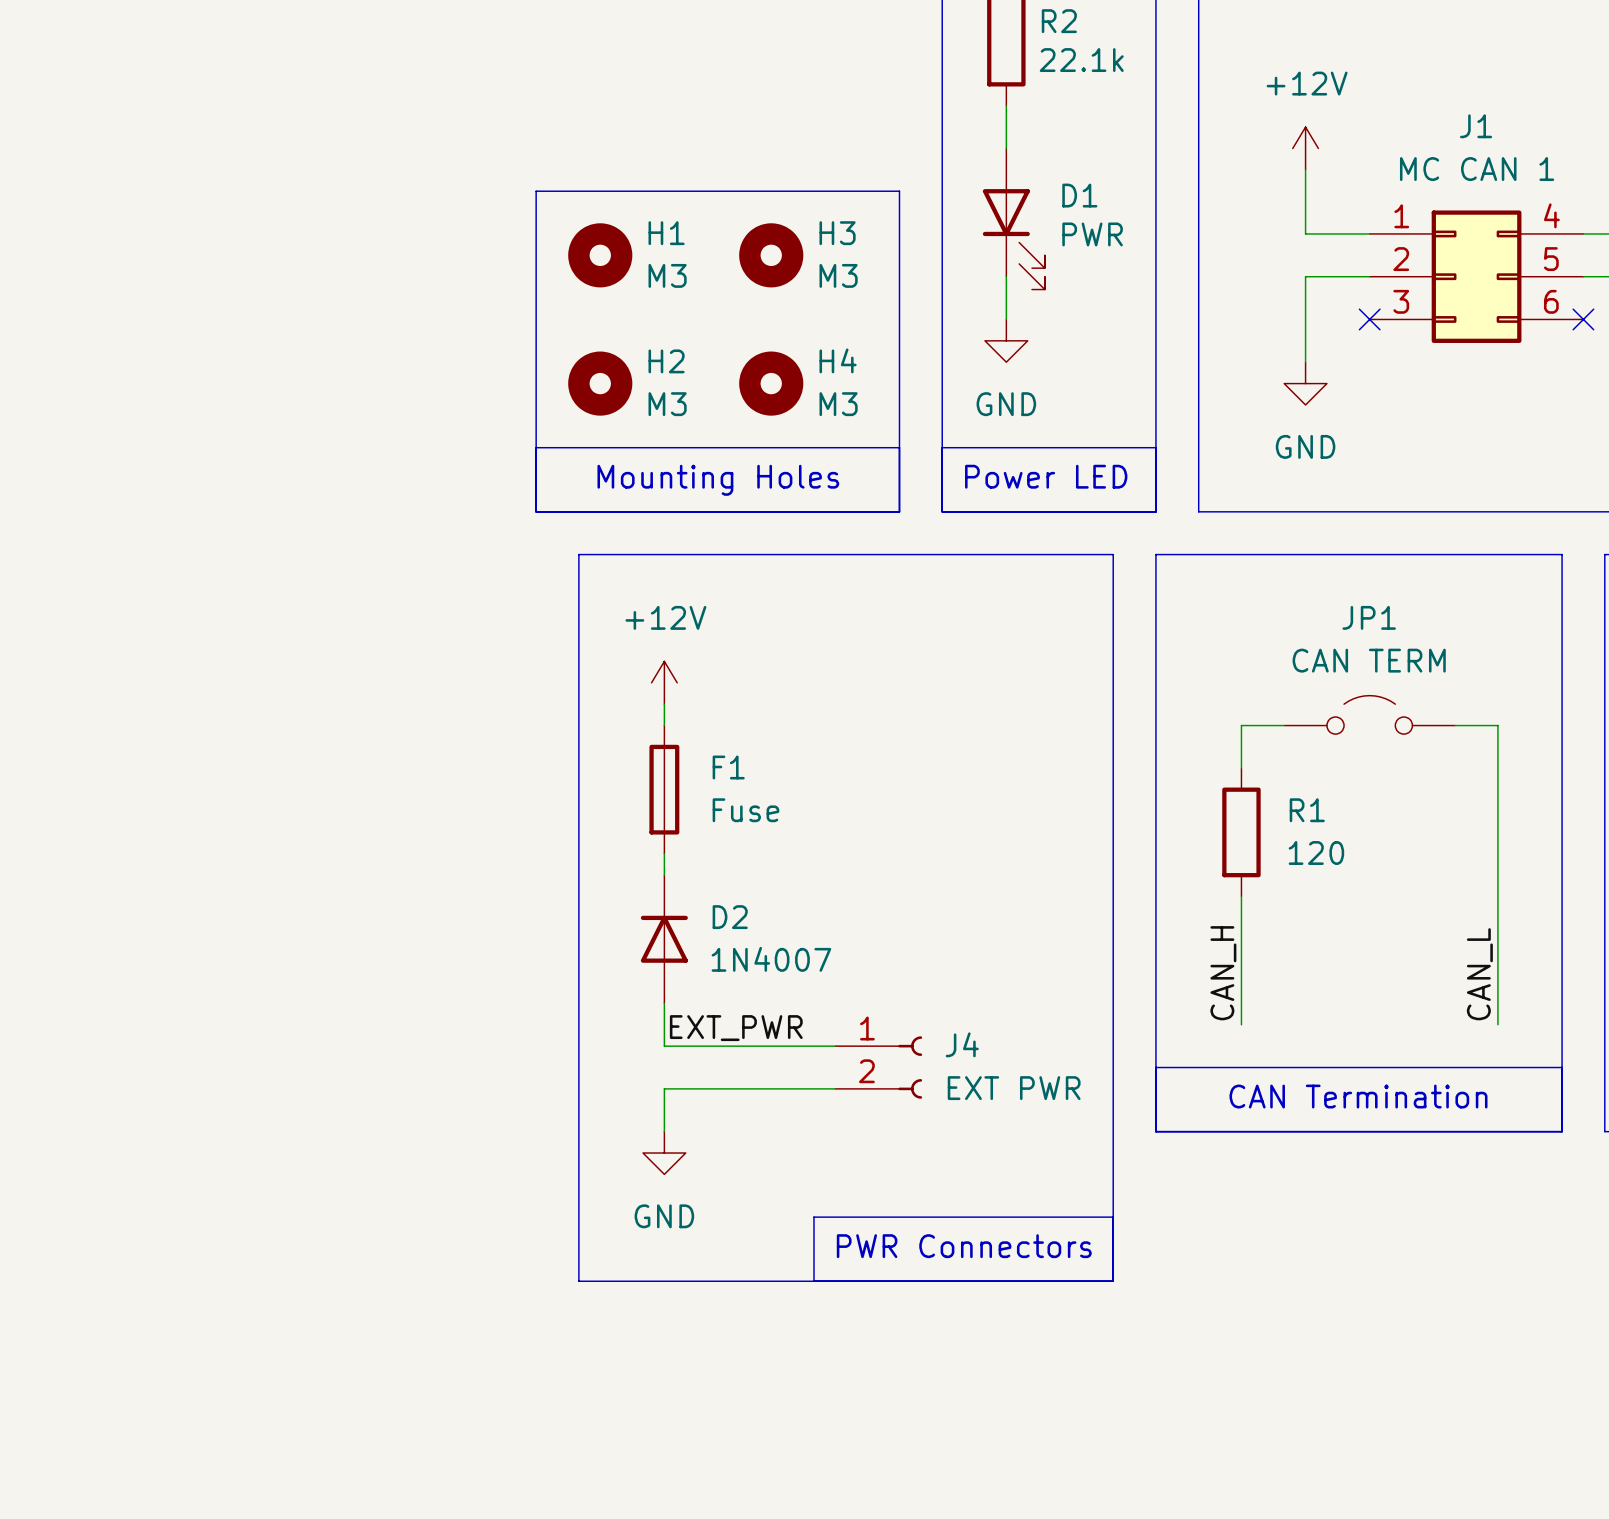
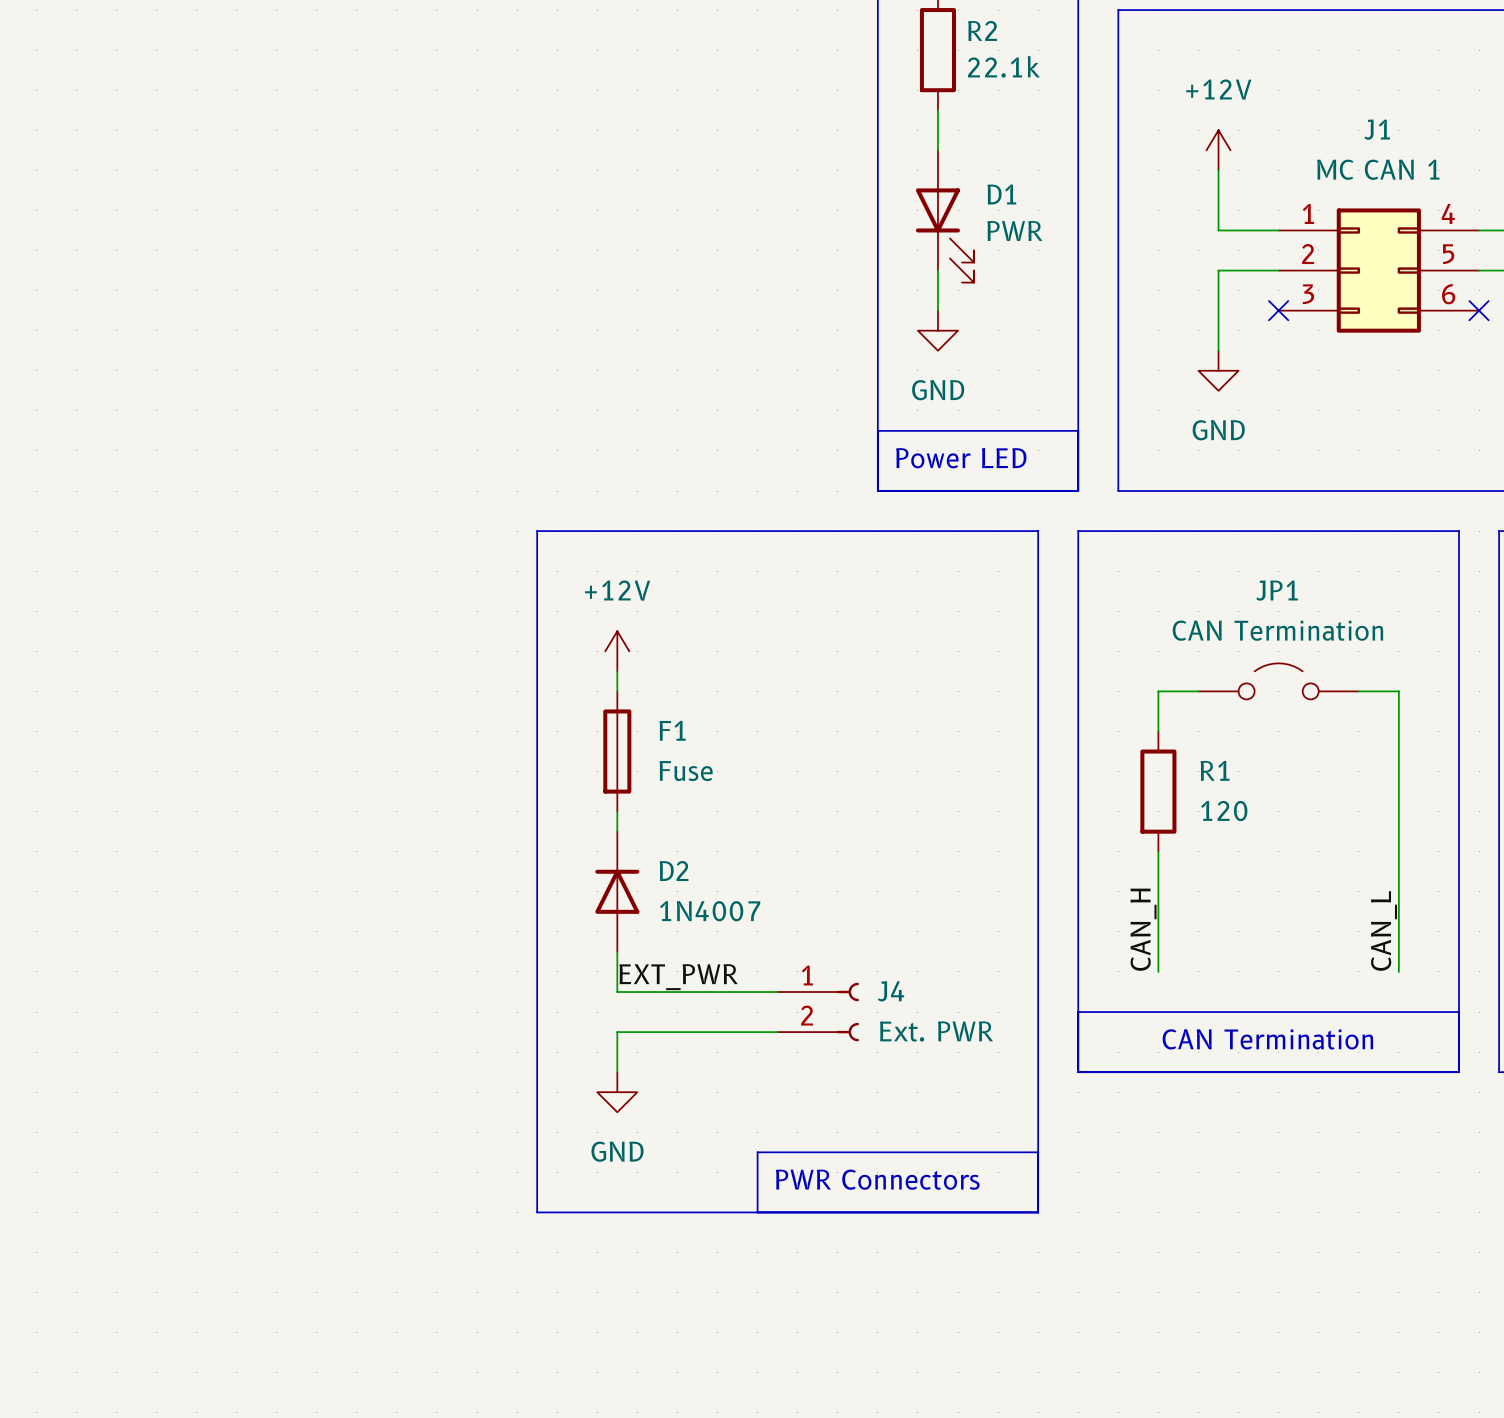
line: (536, 191) (899, 191) (899, 511) (536, 511) (536, 191) -> none
H1: M3 (600, 255) -> none
H3: M3 (771, 255) -> none
H2: M3 (600, 383) -> none
H4: M3 (771, 383) -> none
line: (536, 447) (899, 447) -> none
text: Mounting Holes (718, 480) -> none
JP1 value: CAN TERM (1369, 660) -> CAN Termination (1277, 630)
J4 value: EXT PWR (1014, 1088) -> Ext. PWR (936, 1031)

